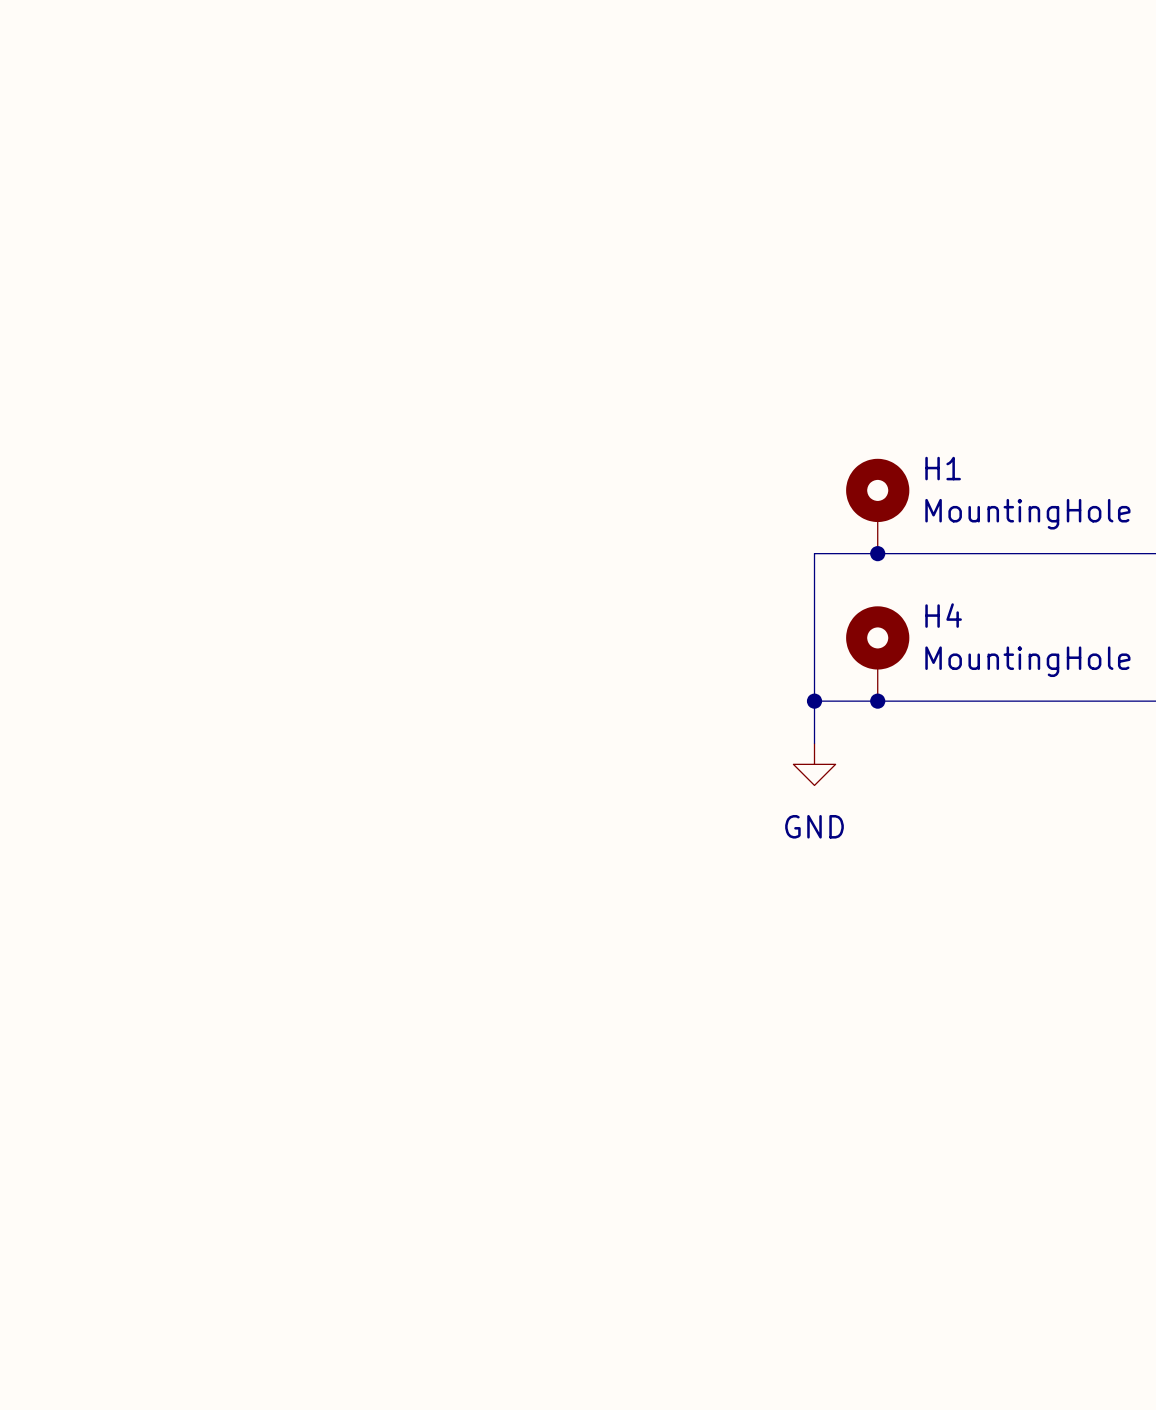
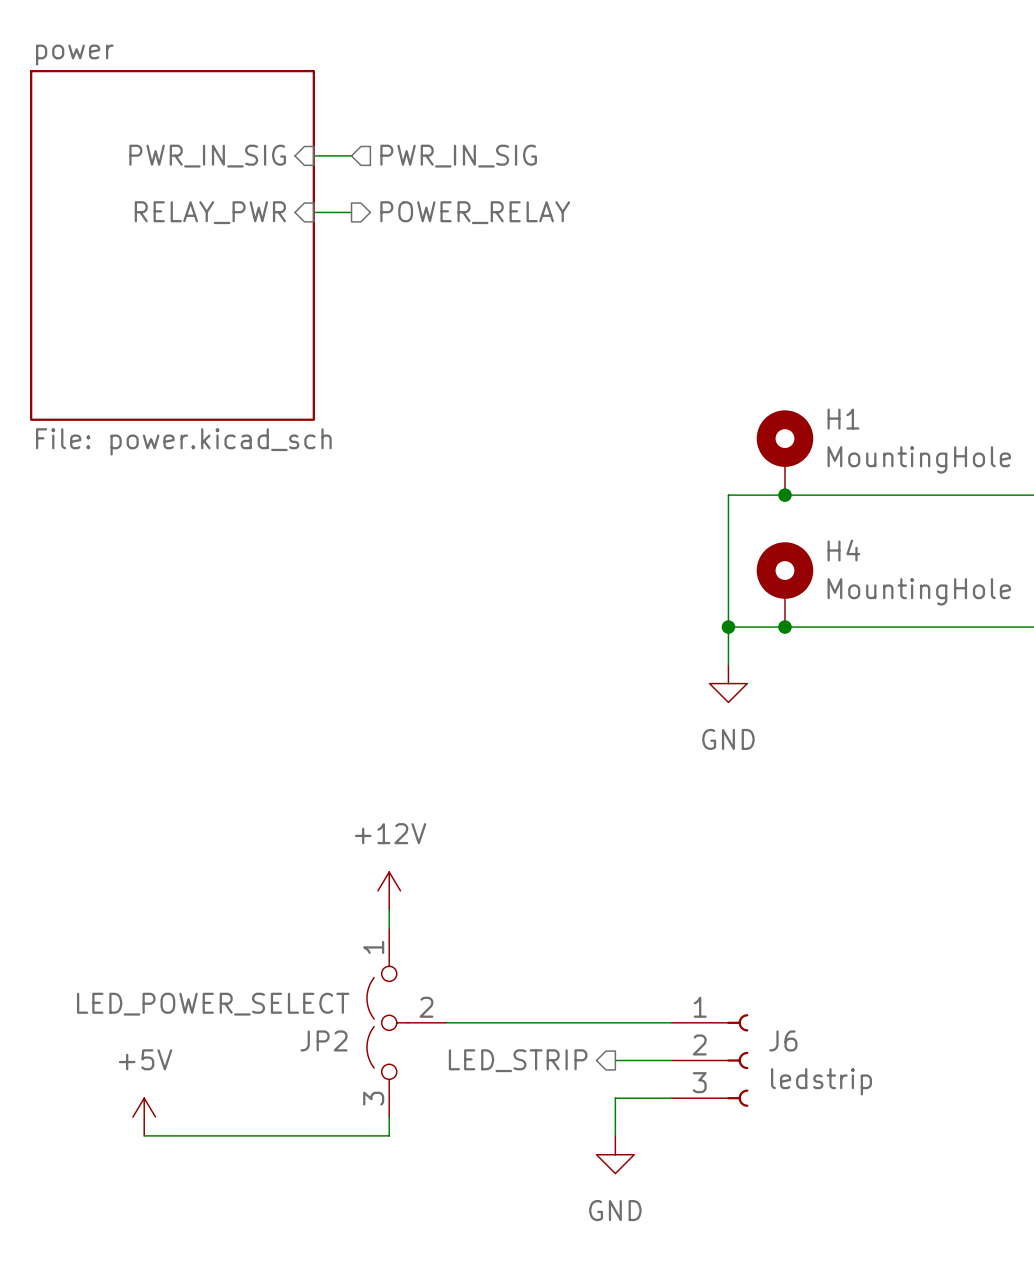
sheet pin: none -> PWR_IN_SIG (207, 156)
wire: none -> (313, 155) (351, 155)
hierarchical label: none -> PWR_IN_SIG (458, 156)
sheet pin: none -> RELAY_PWR (210, 212)
wire: none -> (313, 212) (351, 212)
hierarchical label: none -> POWER_RELAY (475, 212)
sheet power: none -> File: power.kicad_sch (172, 245)
power symbol: none -> +12V (389, 890)
wire: none -> (389, 909) (389, 928)
JP2: none -> LED_POWER_SELECT (406, 1022)
wire: none -> (445, 1022) (671, 1022)
wire: none -> (615, 1060) (671, 1060)
J6: none -> ledstrip (710, 1060)
hierarchical label: none -> LED_STRIP (518, 1060)
wire: none -> (671, 1098) (615, 1098) (615, 1135)
power symbol: none -> +5V (144, 1117)
wire: none -> (389, 1117) (389, 1135) (144, 1135)
power symbol: none -> GND (615, 1154)

